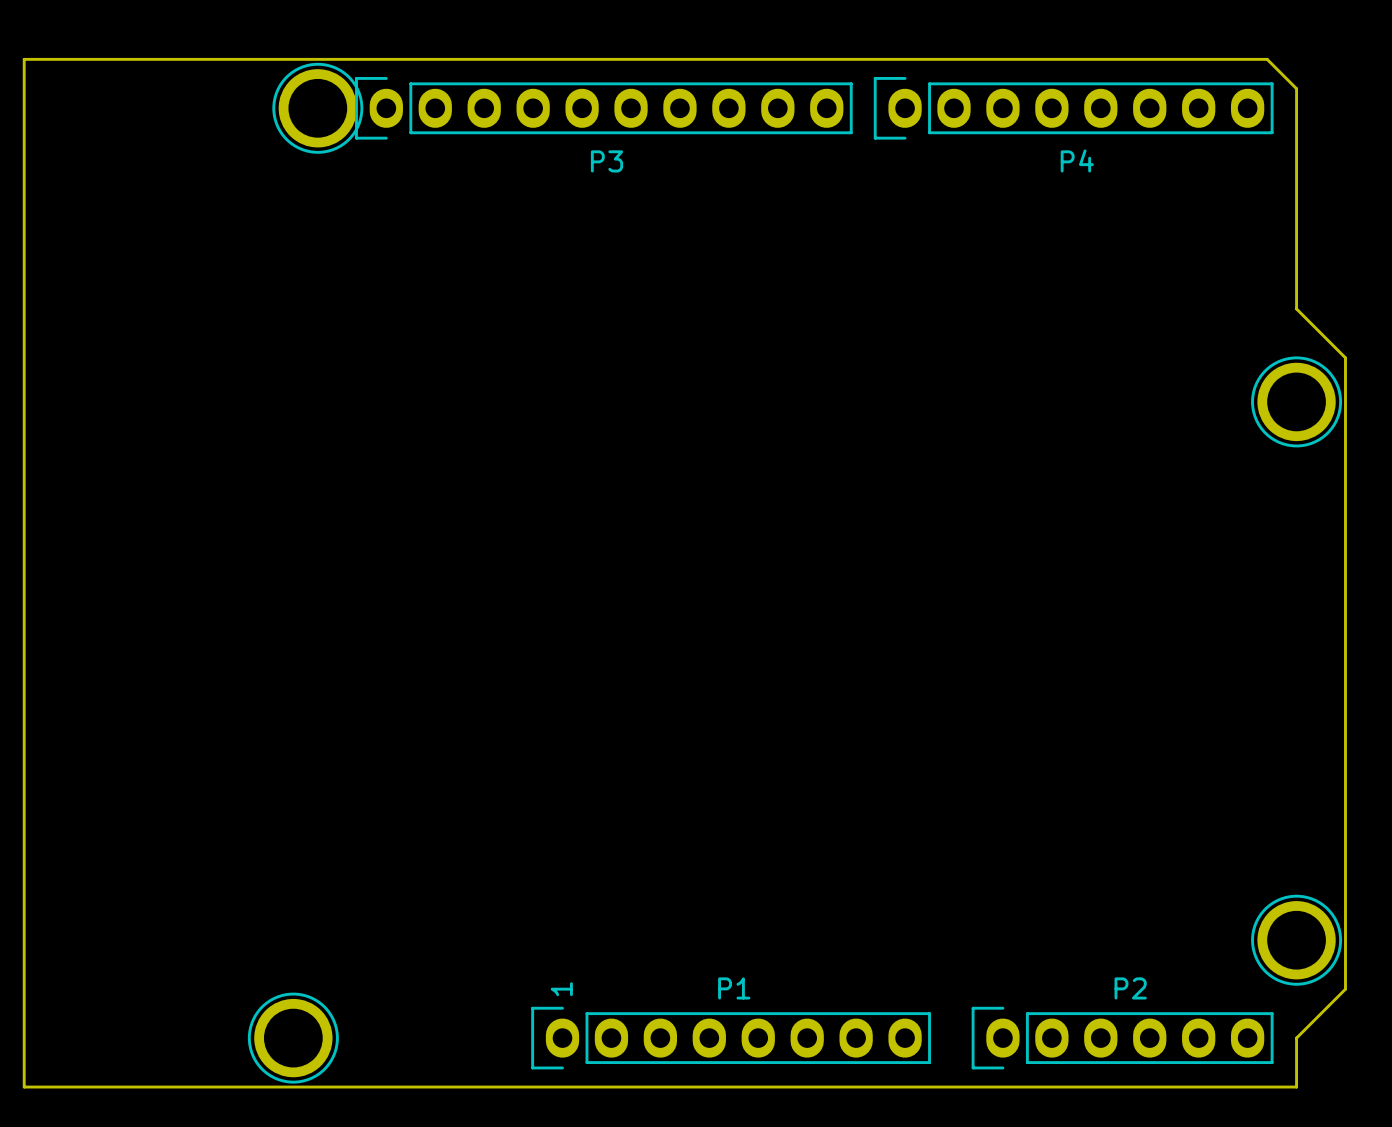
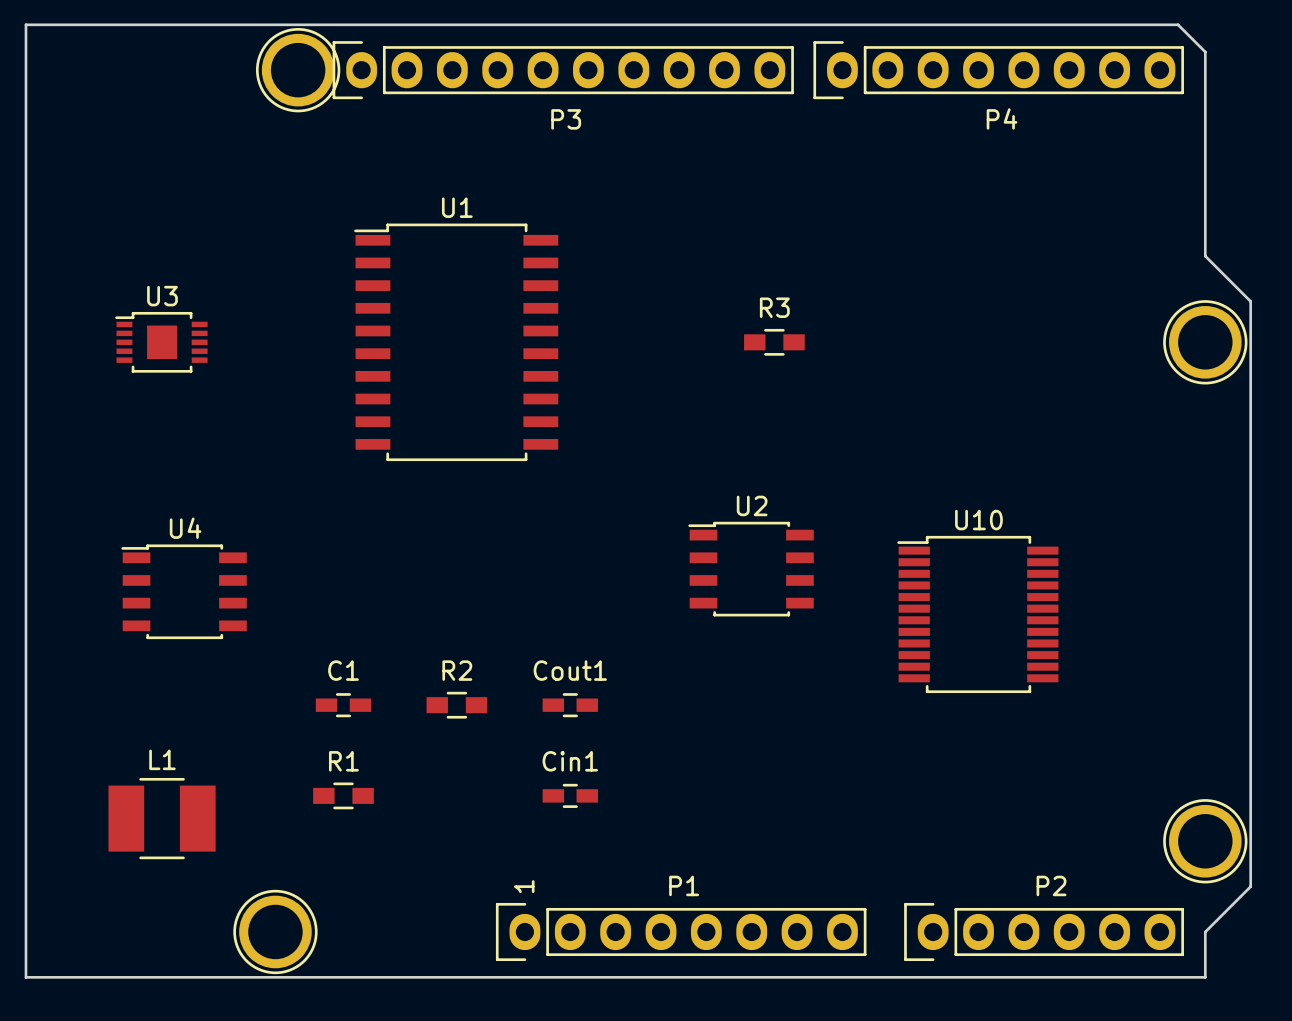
U3: none -> (161, 342)
U1: none -> (456, 342)
R3: none -> (774, 342)
U2: none -> (751, 569)
U4: none -> (184, 591)
U10: none -> (977, 614)
C1: none -> (343, 705)
R2: none -> (456, 705)
Cout1: none -> (570, 705)
R1: none -> (343, 795)
Cin1: none -> (570, 795)
L1: none -> (162, 818)

